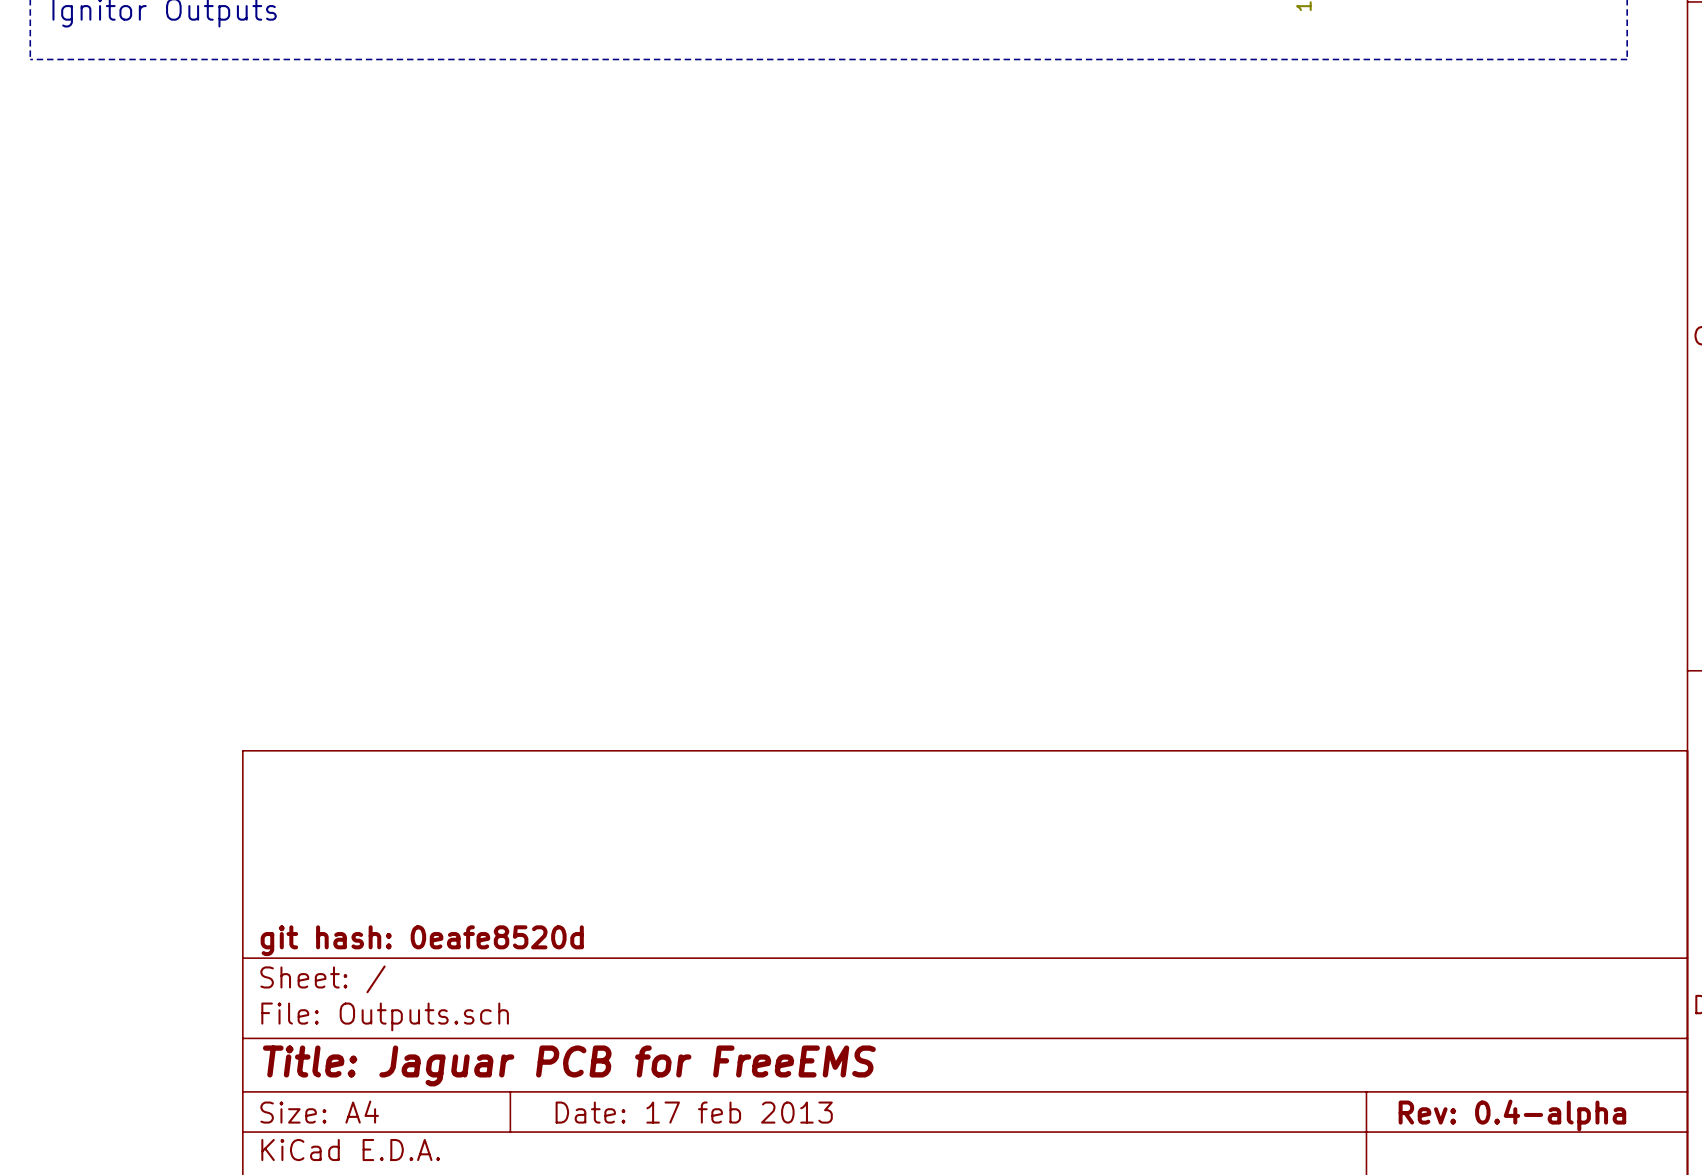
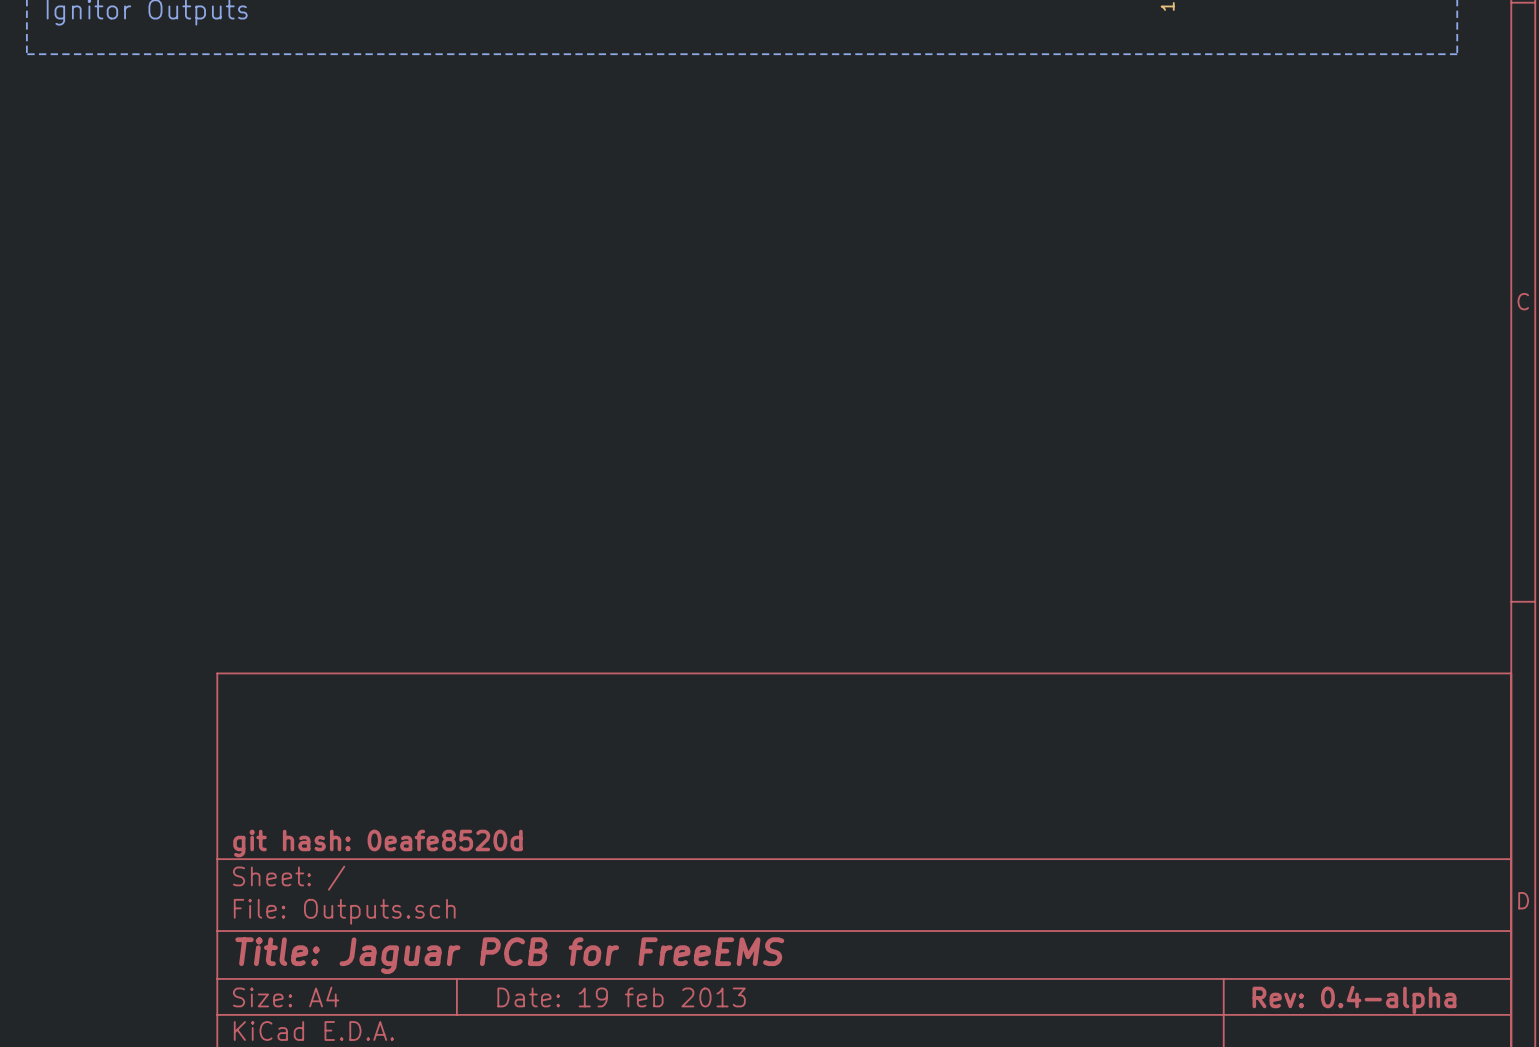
title block: Date: 17 feb 2013 (694, 1112) -> Date: 19 feb 2013 (621, 997)

